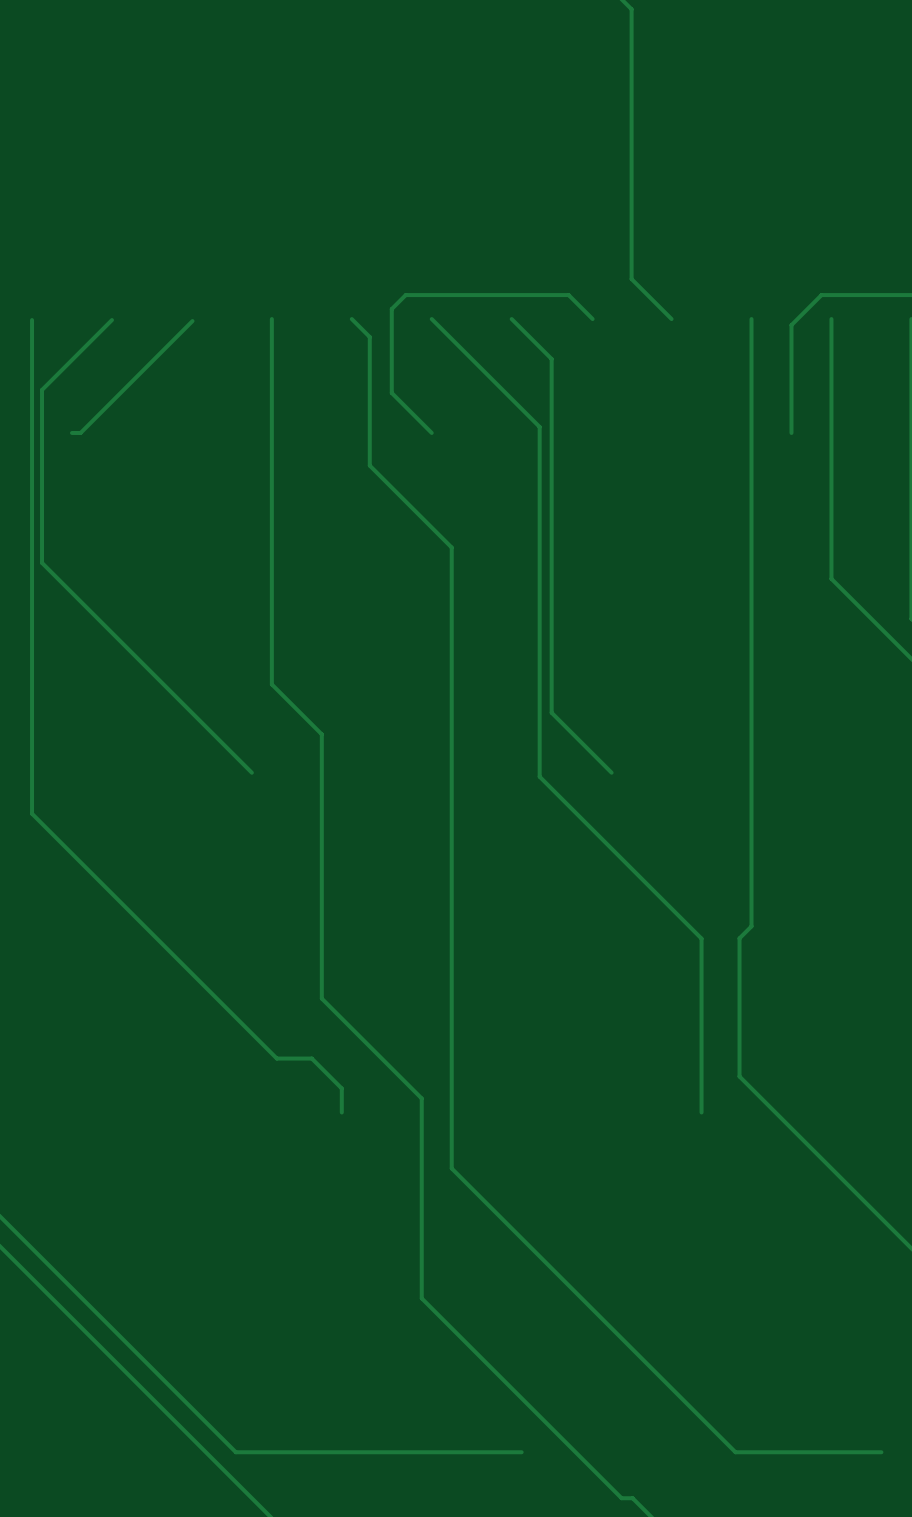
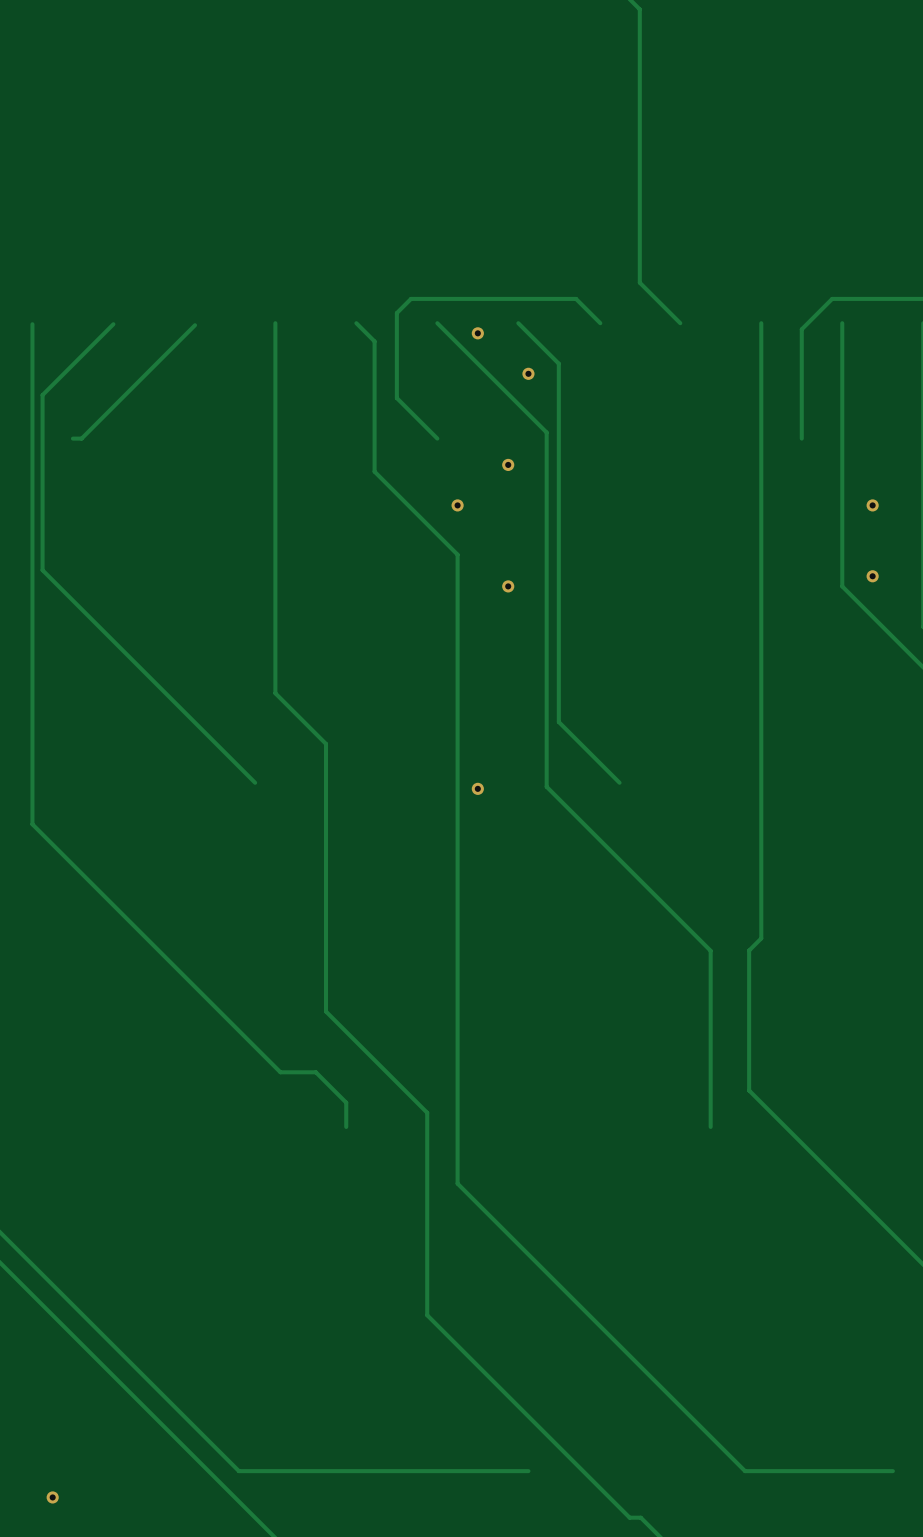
via: none -> (477, 333)
via: none -> (528, 373)
via: none -> (508, 464)
via: none -> (457, 505)
via: none -> (872, 505)
via: none -> (872, 576)
via: none -> (508, 586)
via: none -> (477, 788)
via: none -> (52, 1497)

